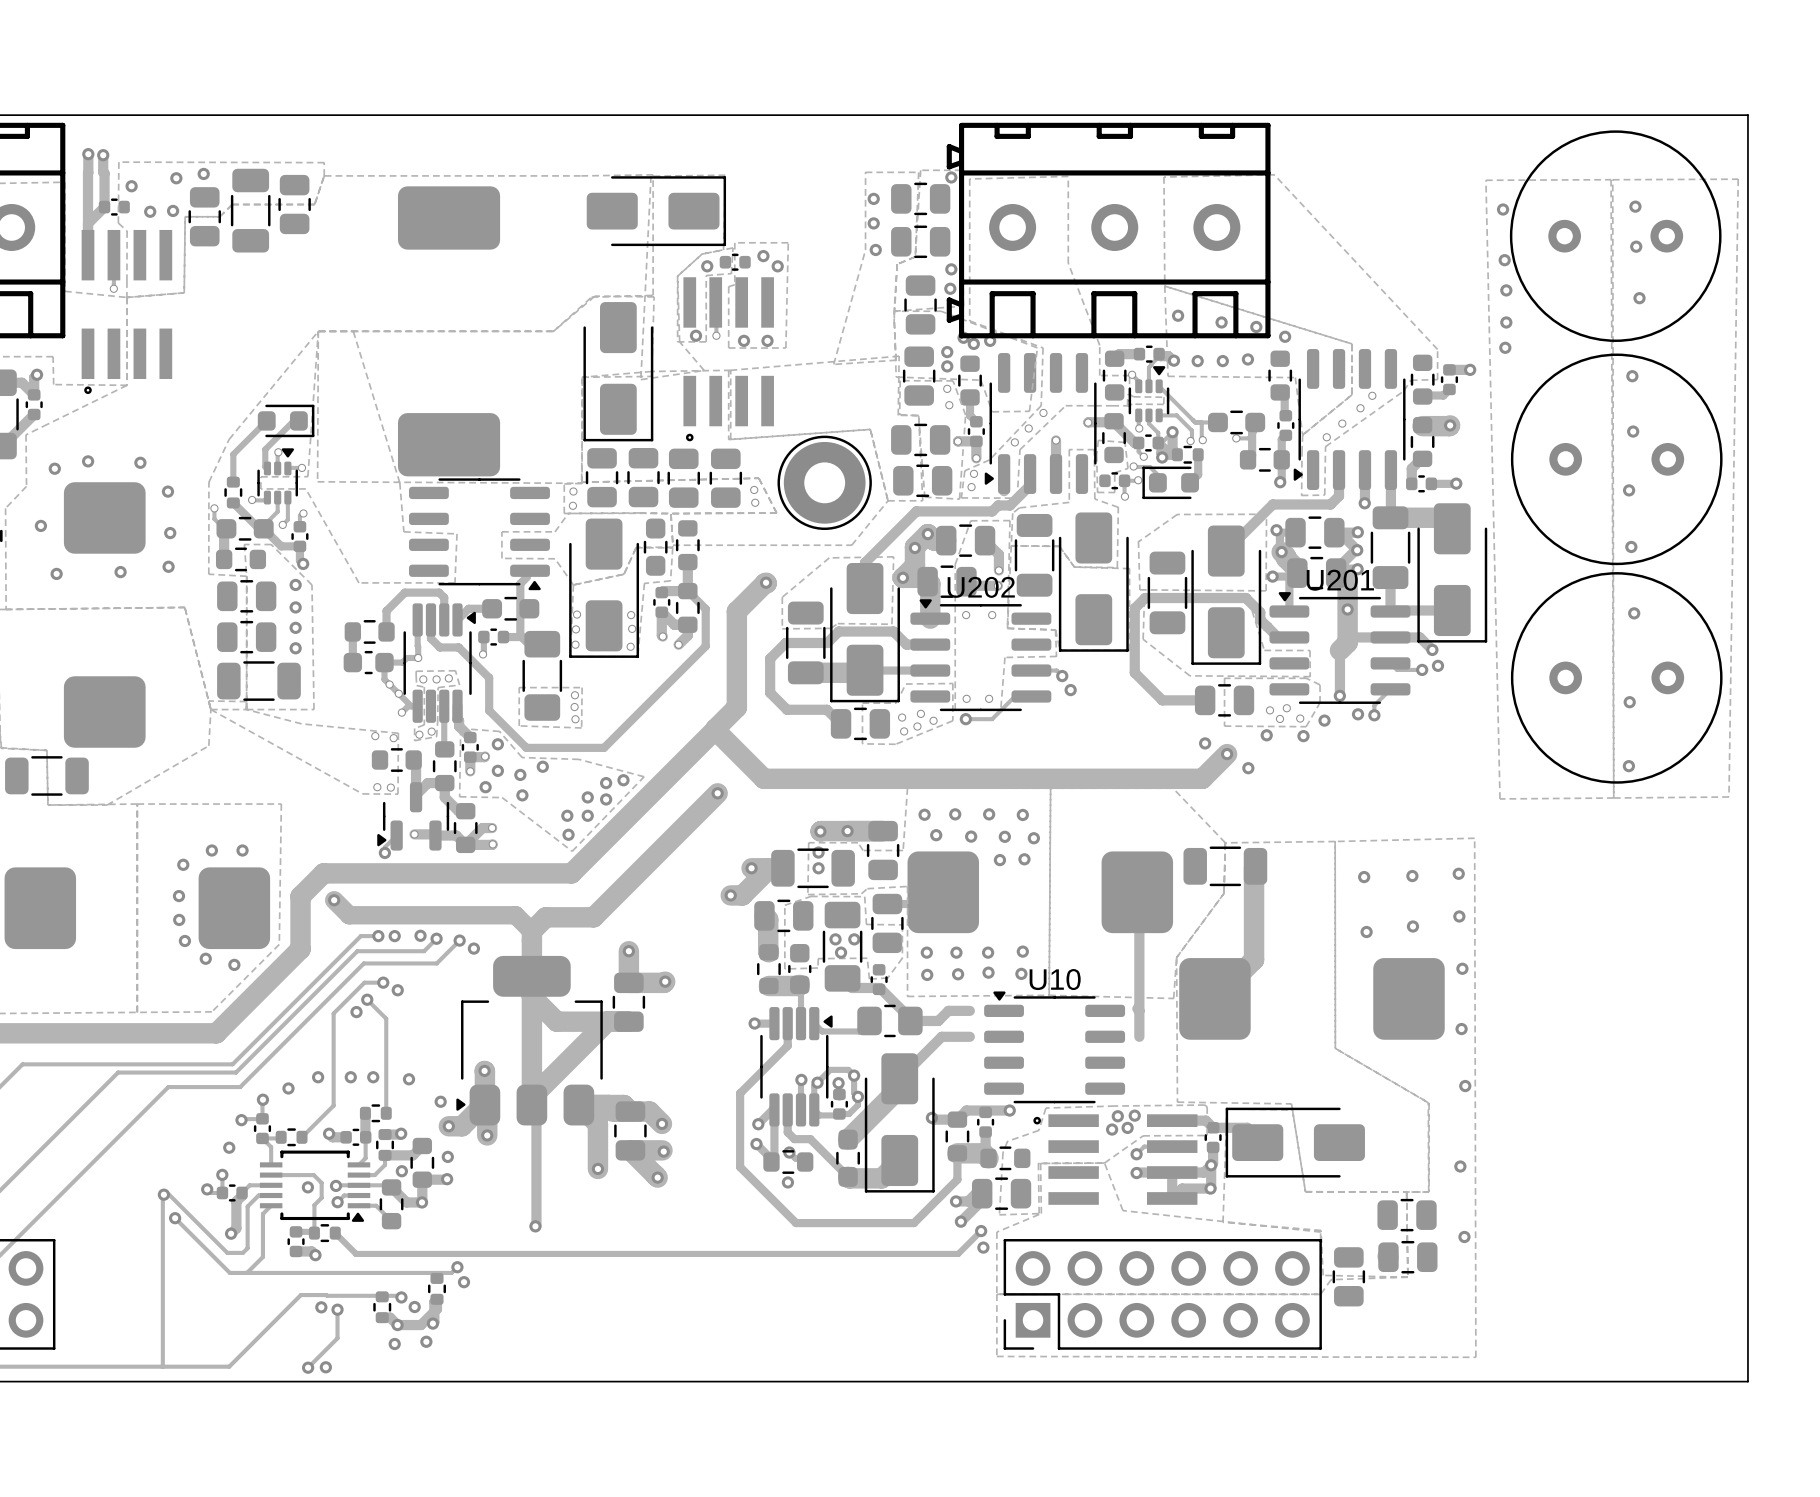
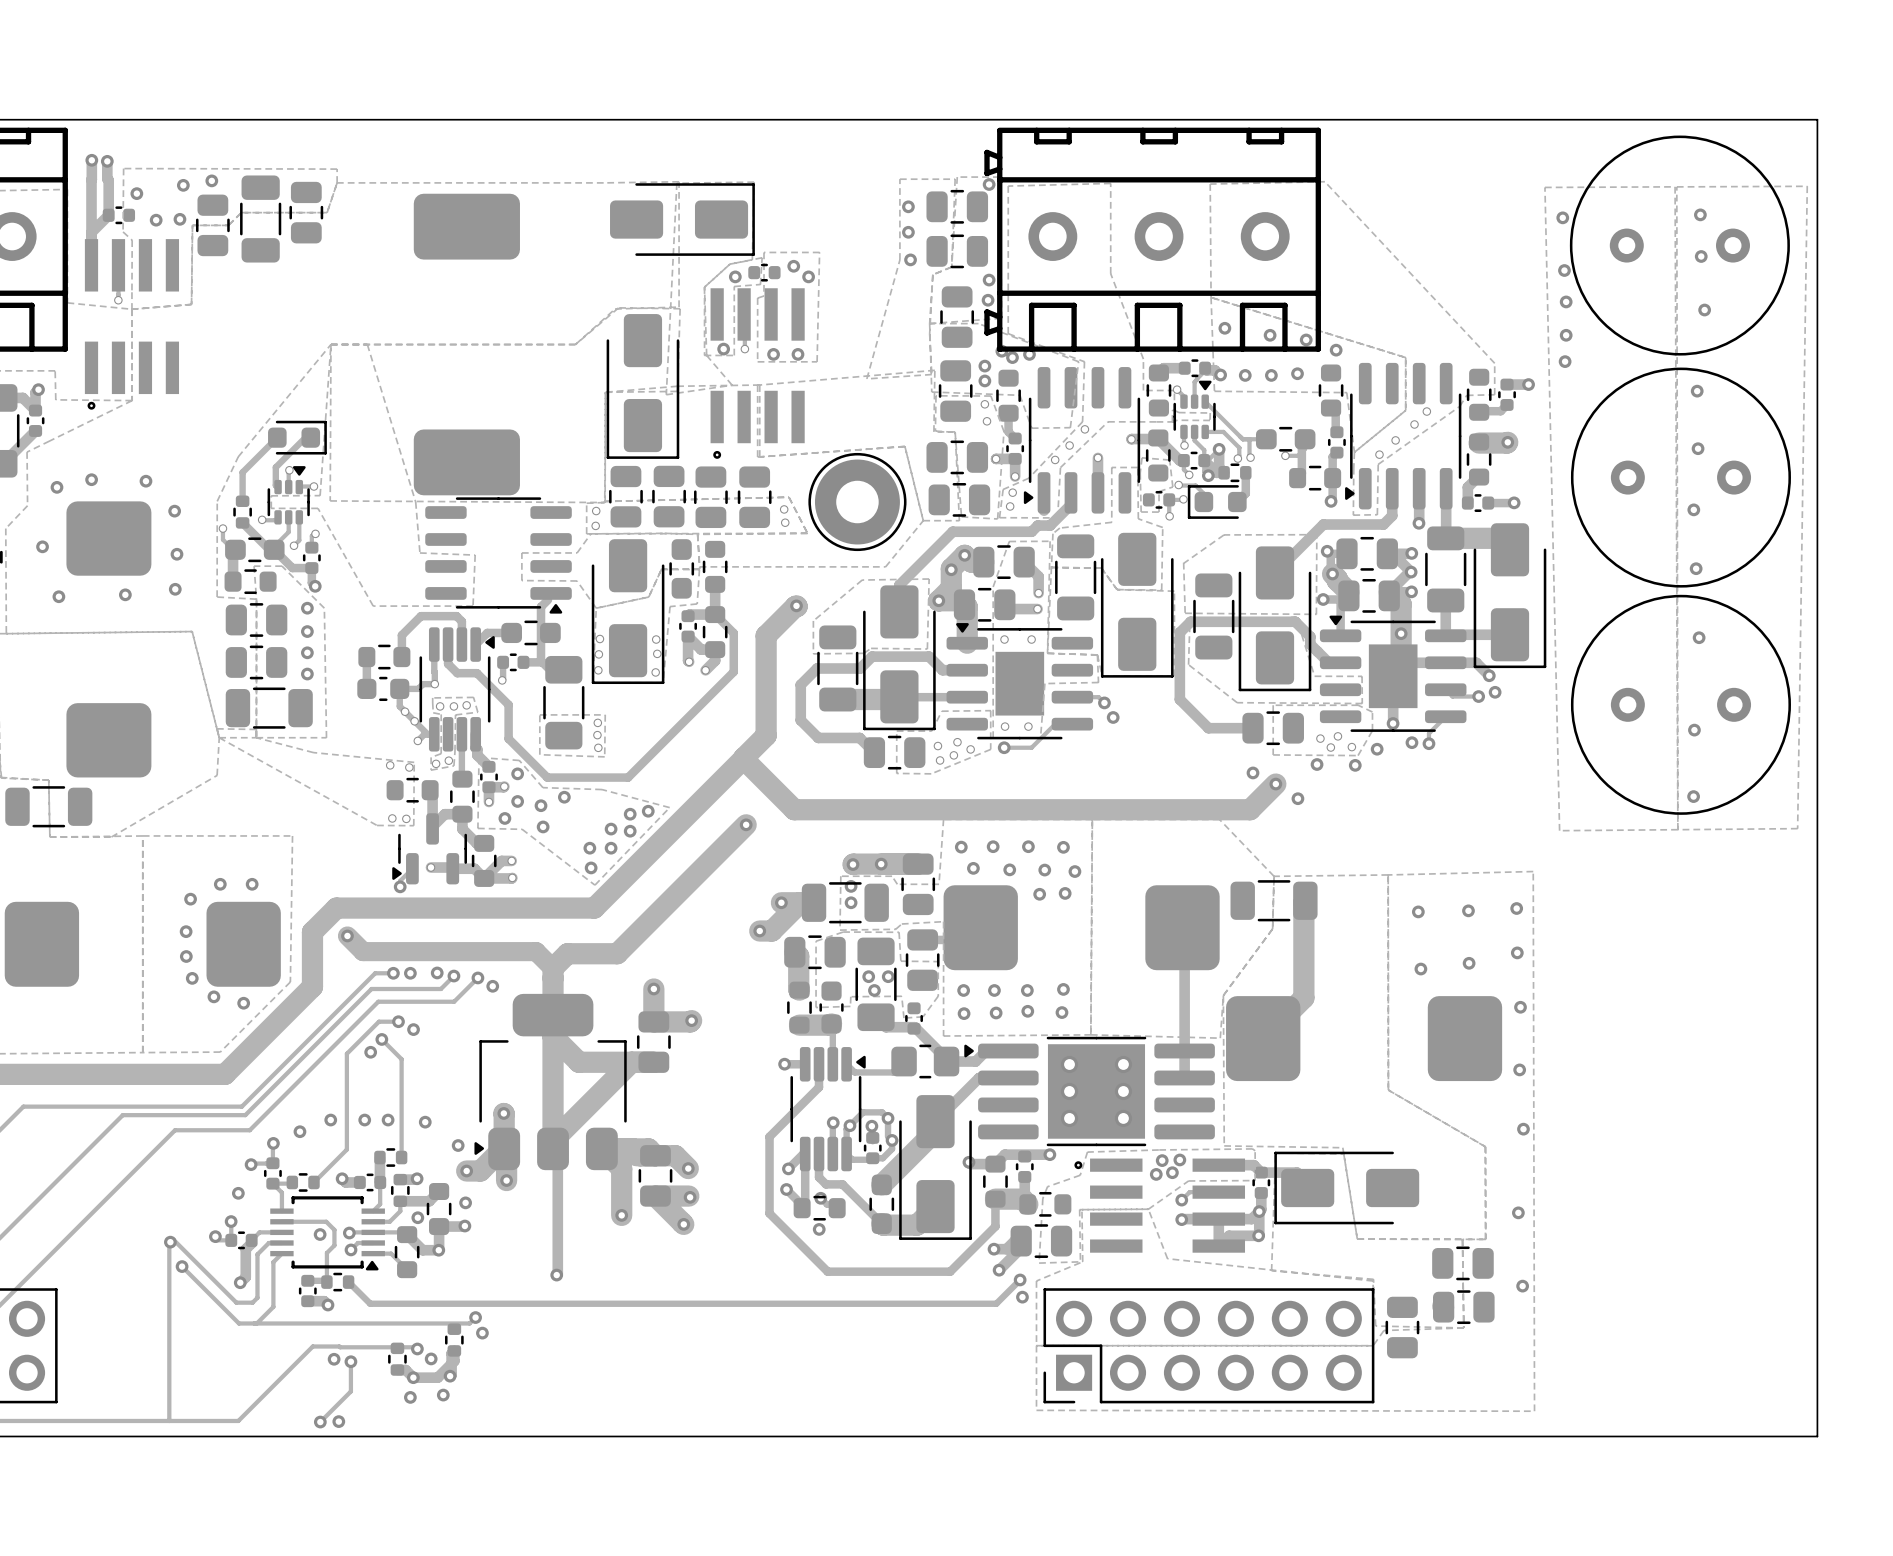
U201: (1339, 648) -> none
part: none -> (1393, 673)
U202: (980, 655) -> none
part: none -> (1019, 681)
U10: (1054, 1047) -> none
part: none -> (1089, 1091)

